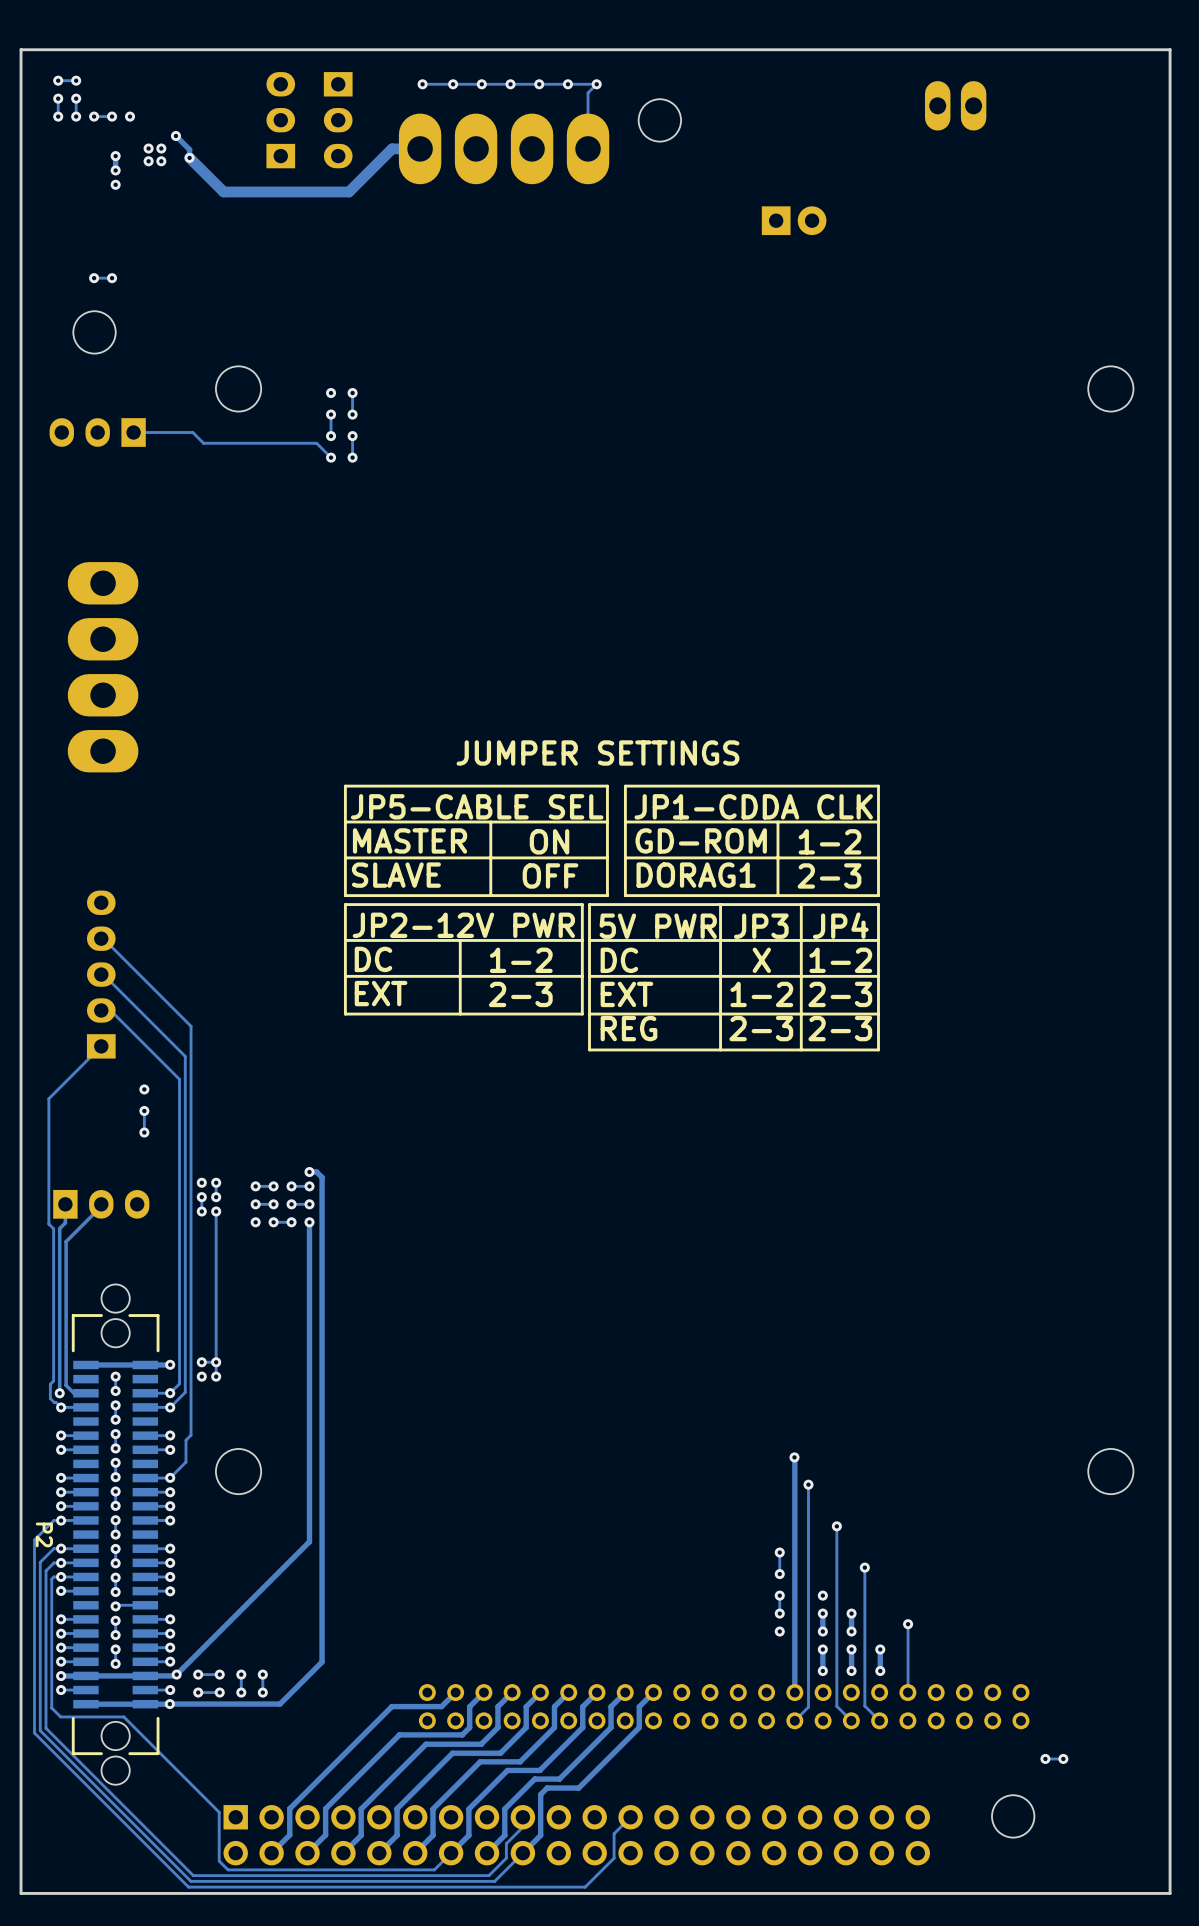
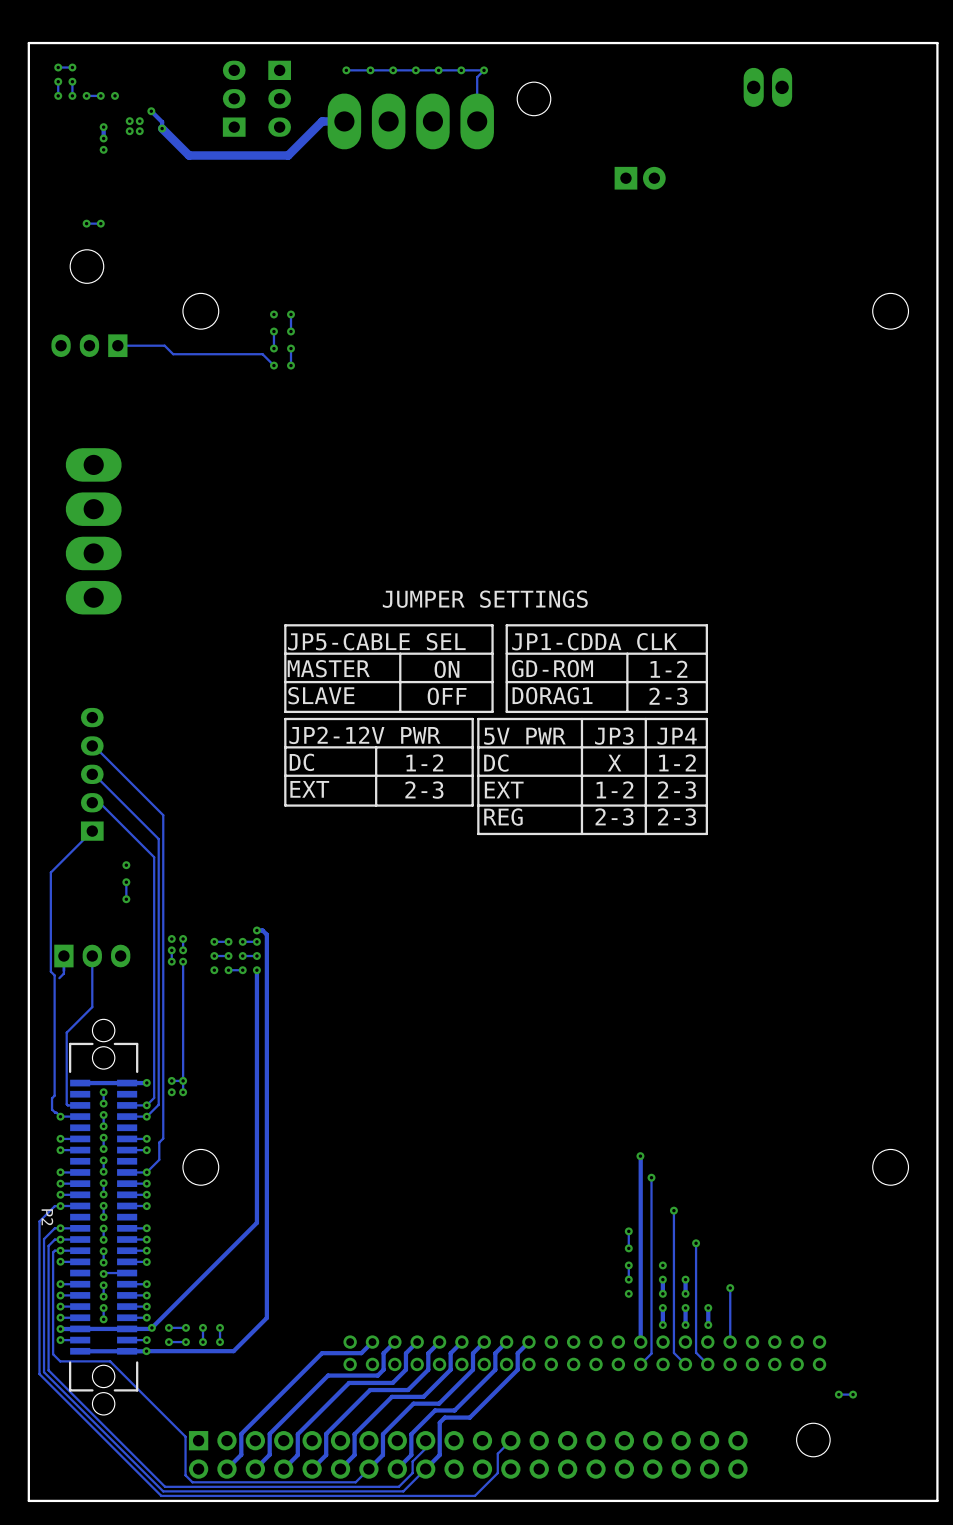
track: (101, 1206) (66, 1241) (66, 1385) (73, 1393) -> (92, 957) (92, 1007) (66, 1032) (66, 1104) (70, 1105)
track: (65, 1222) (59, 1228) (59, 1393) -> (63, 970) (63, 973) (59, 978)
via: (59, 1393) -> none

